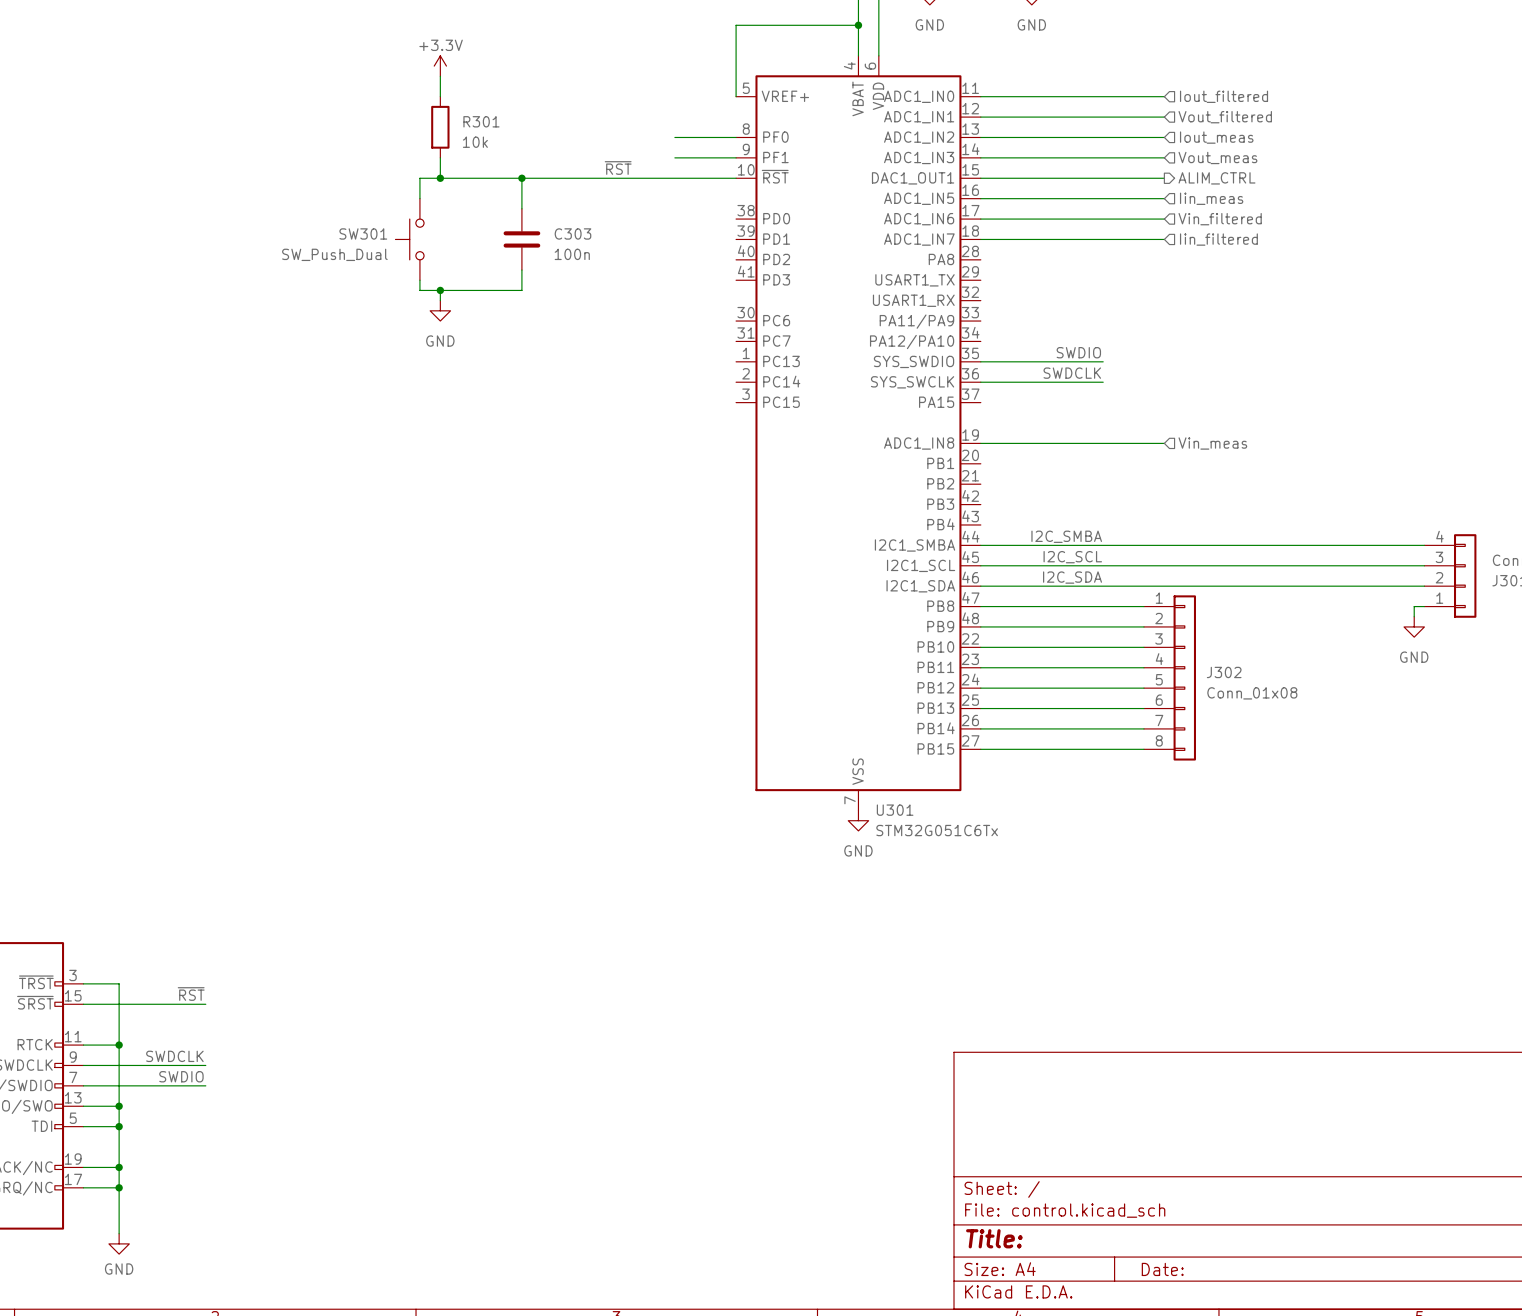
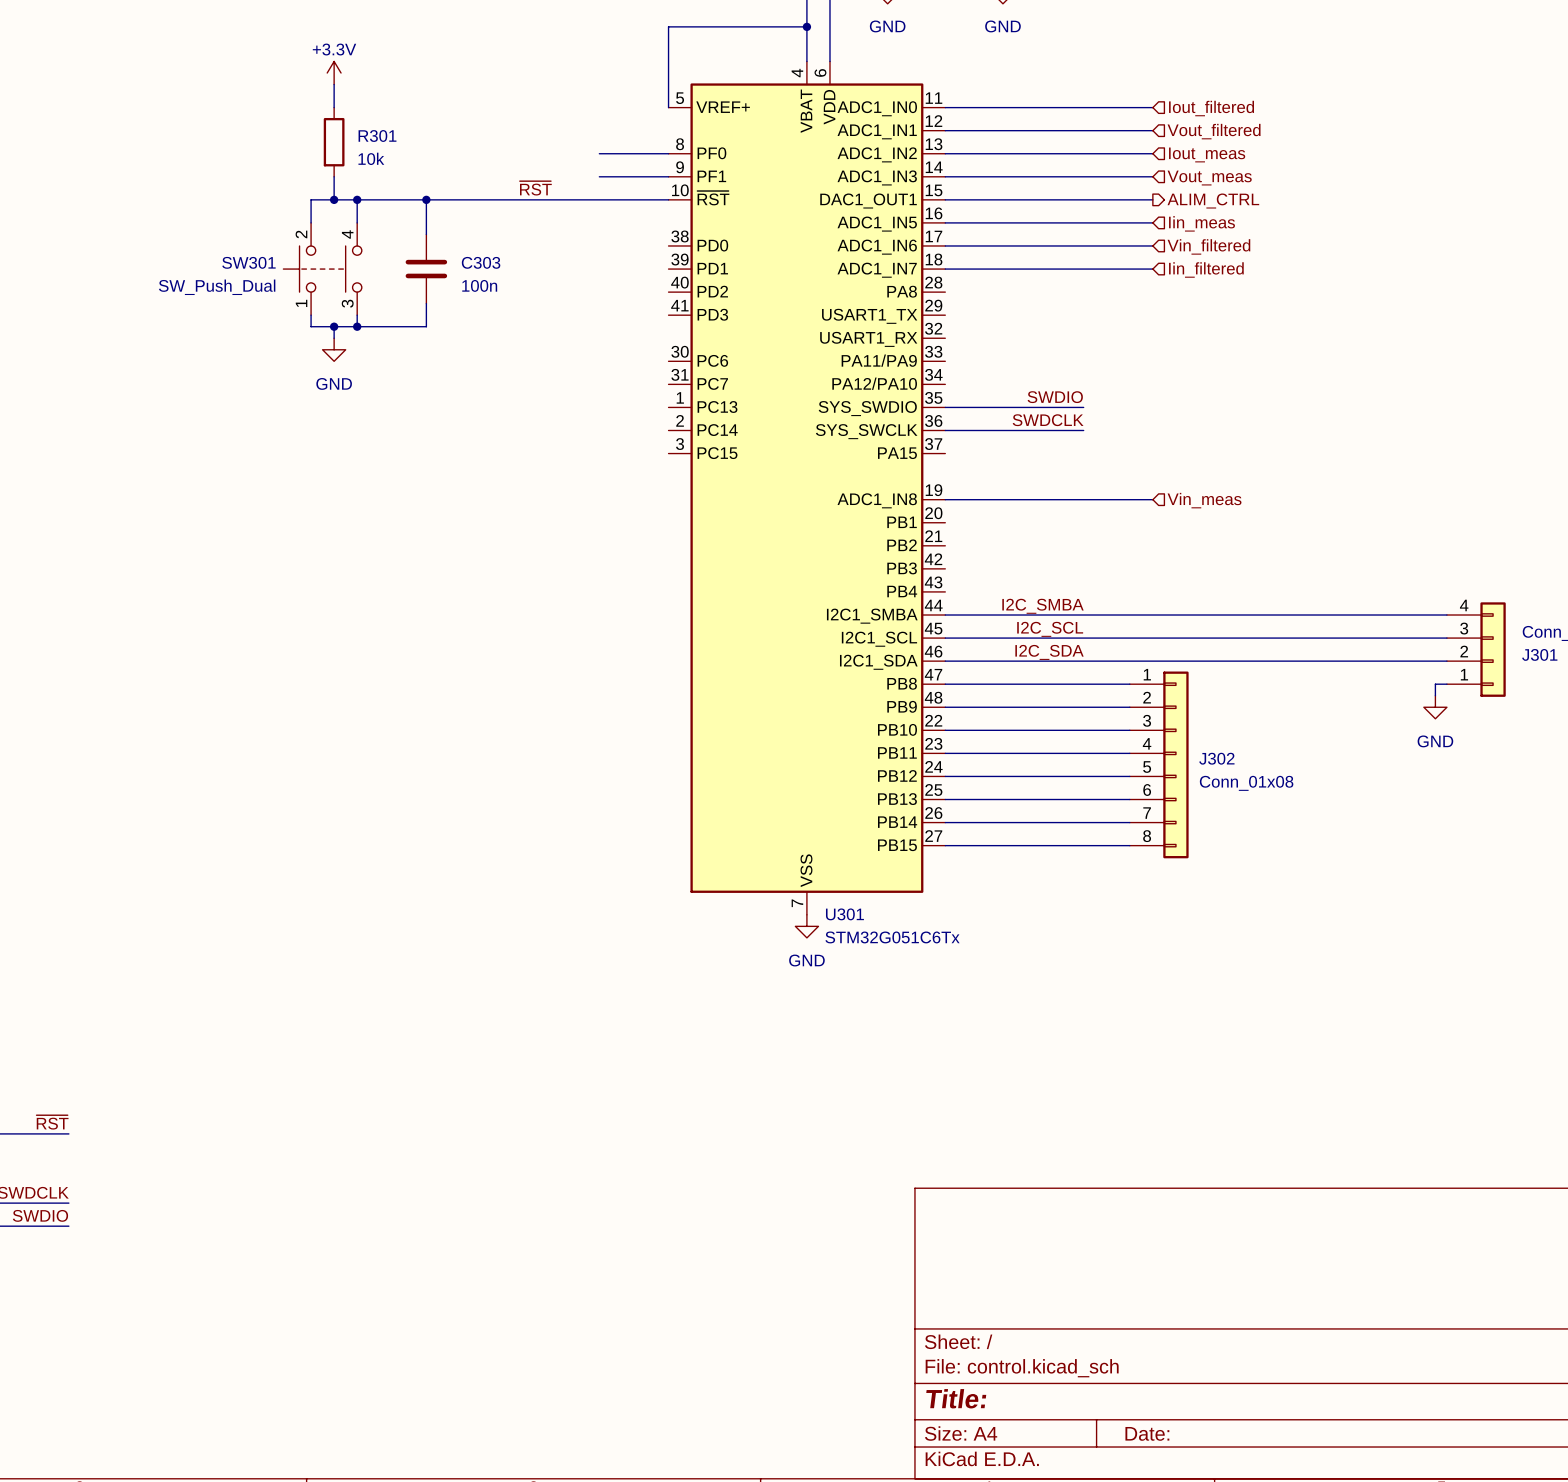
wire: none -> (357, 199) (357, 222)
junction: none -> (357, 199)
SW301 symbol: [395, 198, 425, 281] -> [283, 222, 362, 316]
wire: none -> (357, 315) (357, 326)
junction: none -> (357, 326)

